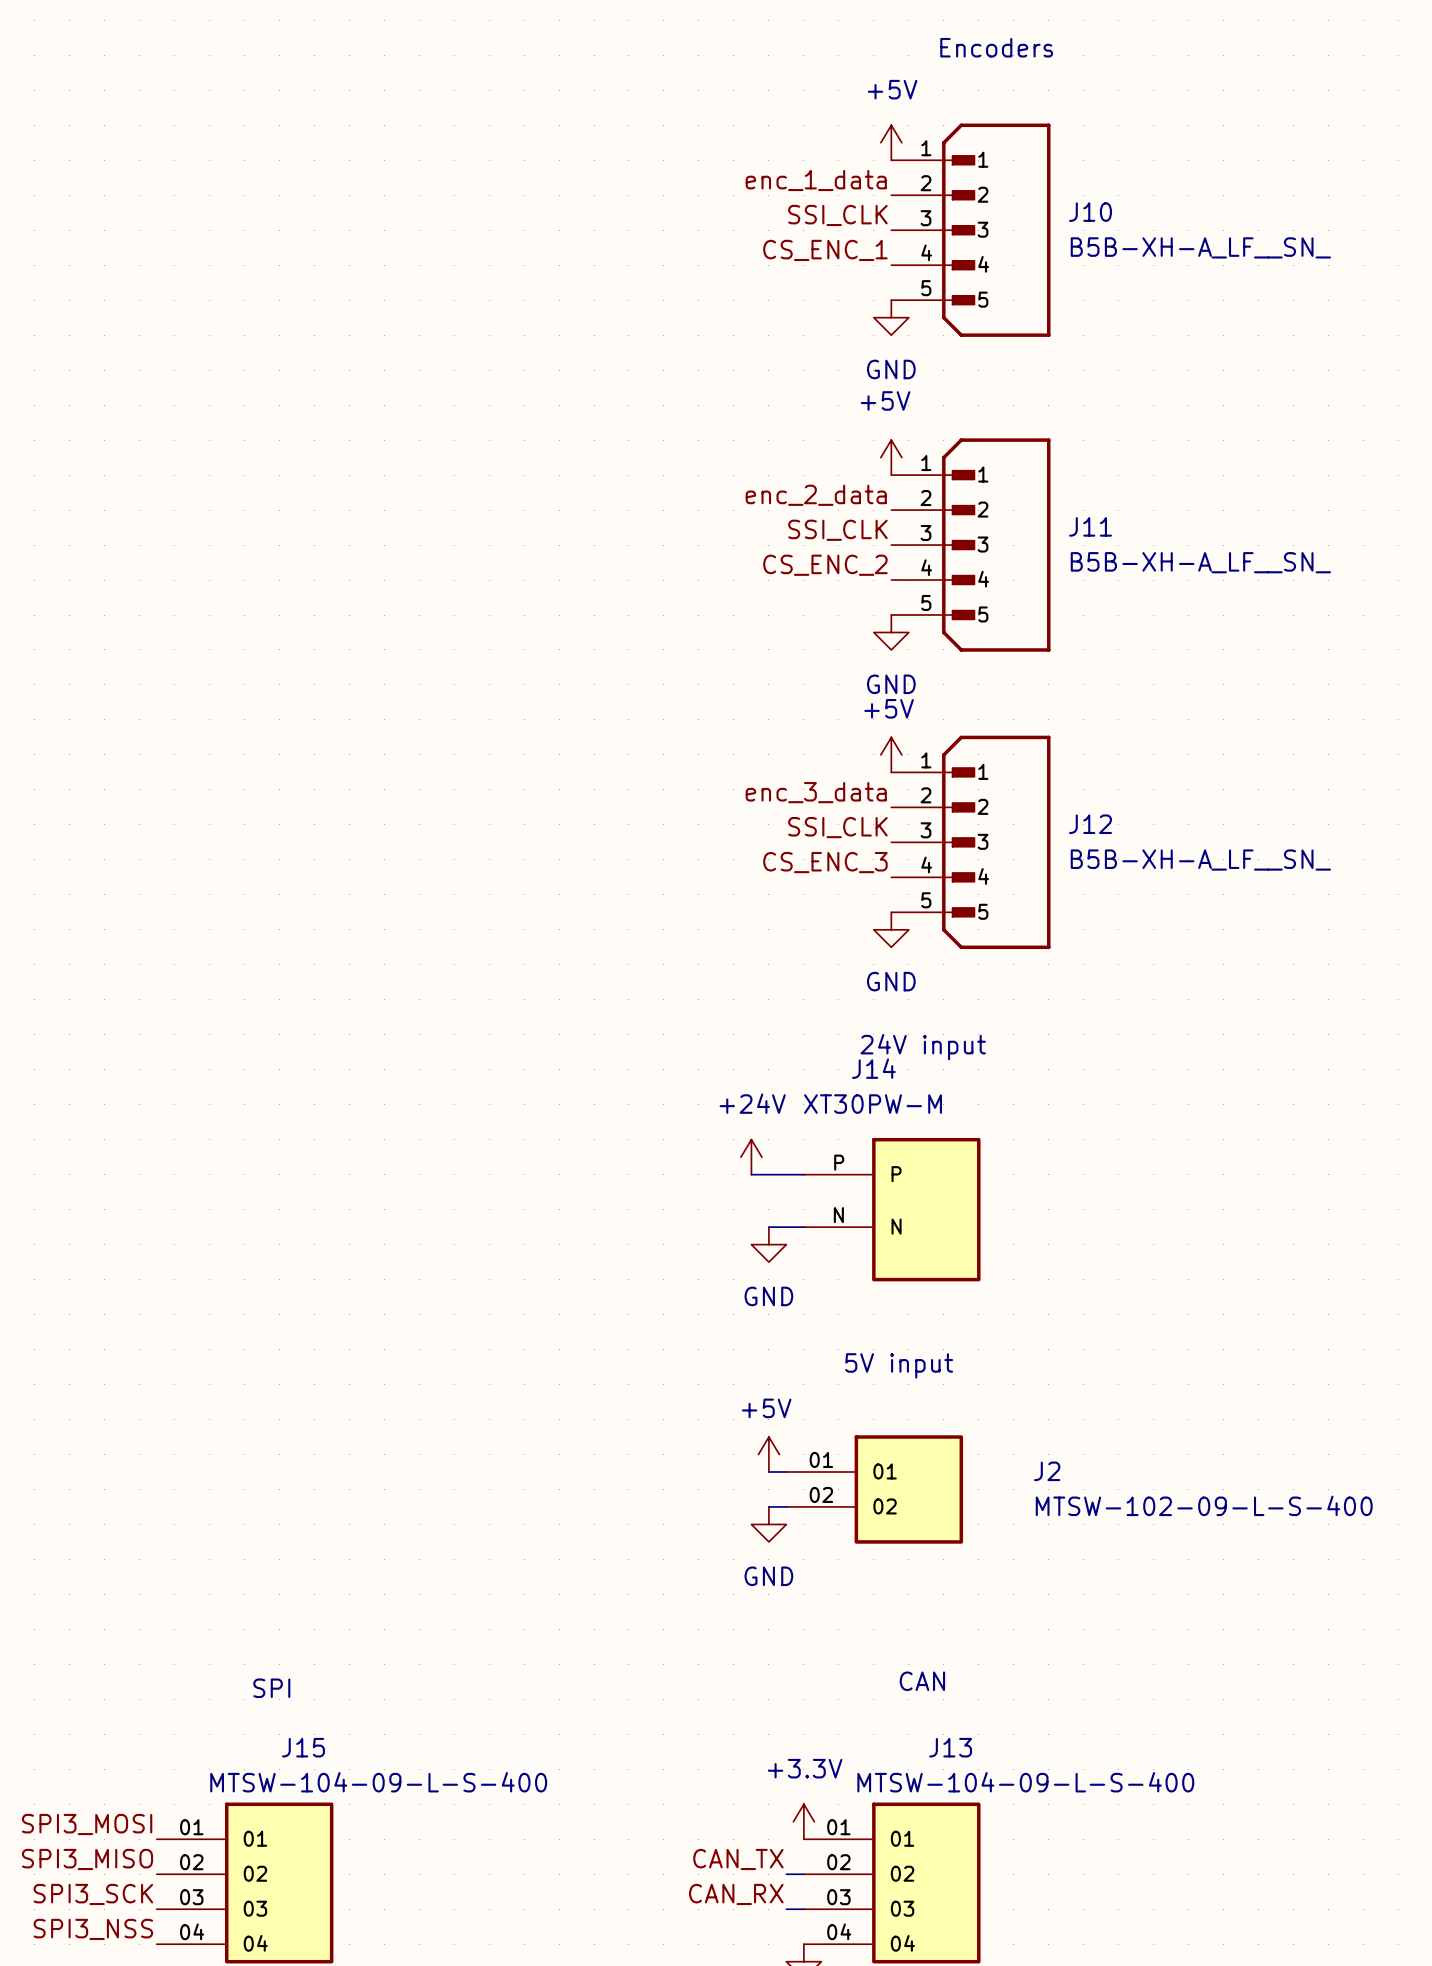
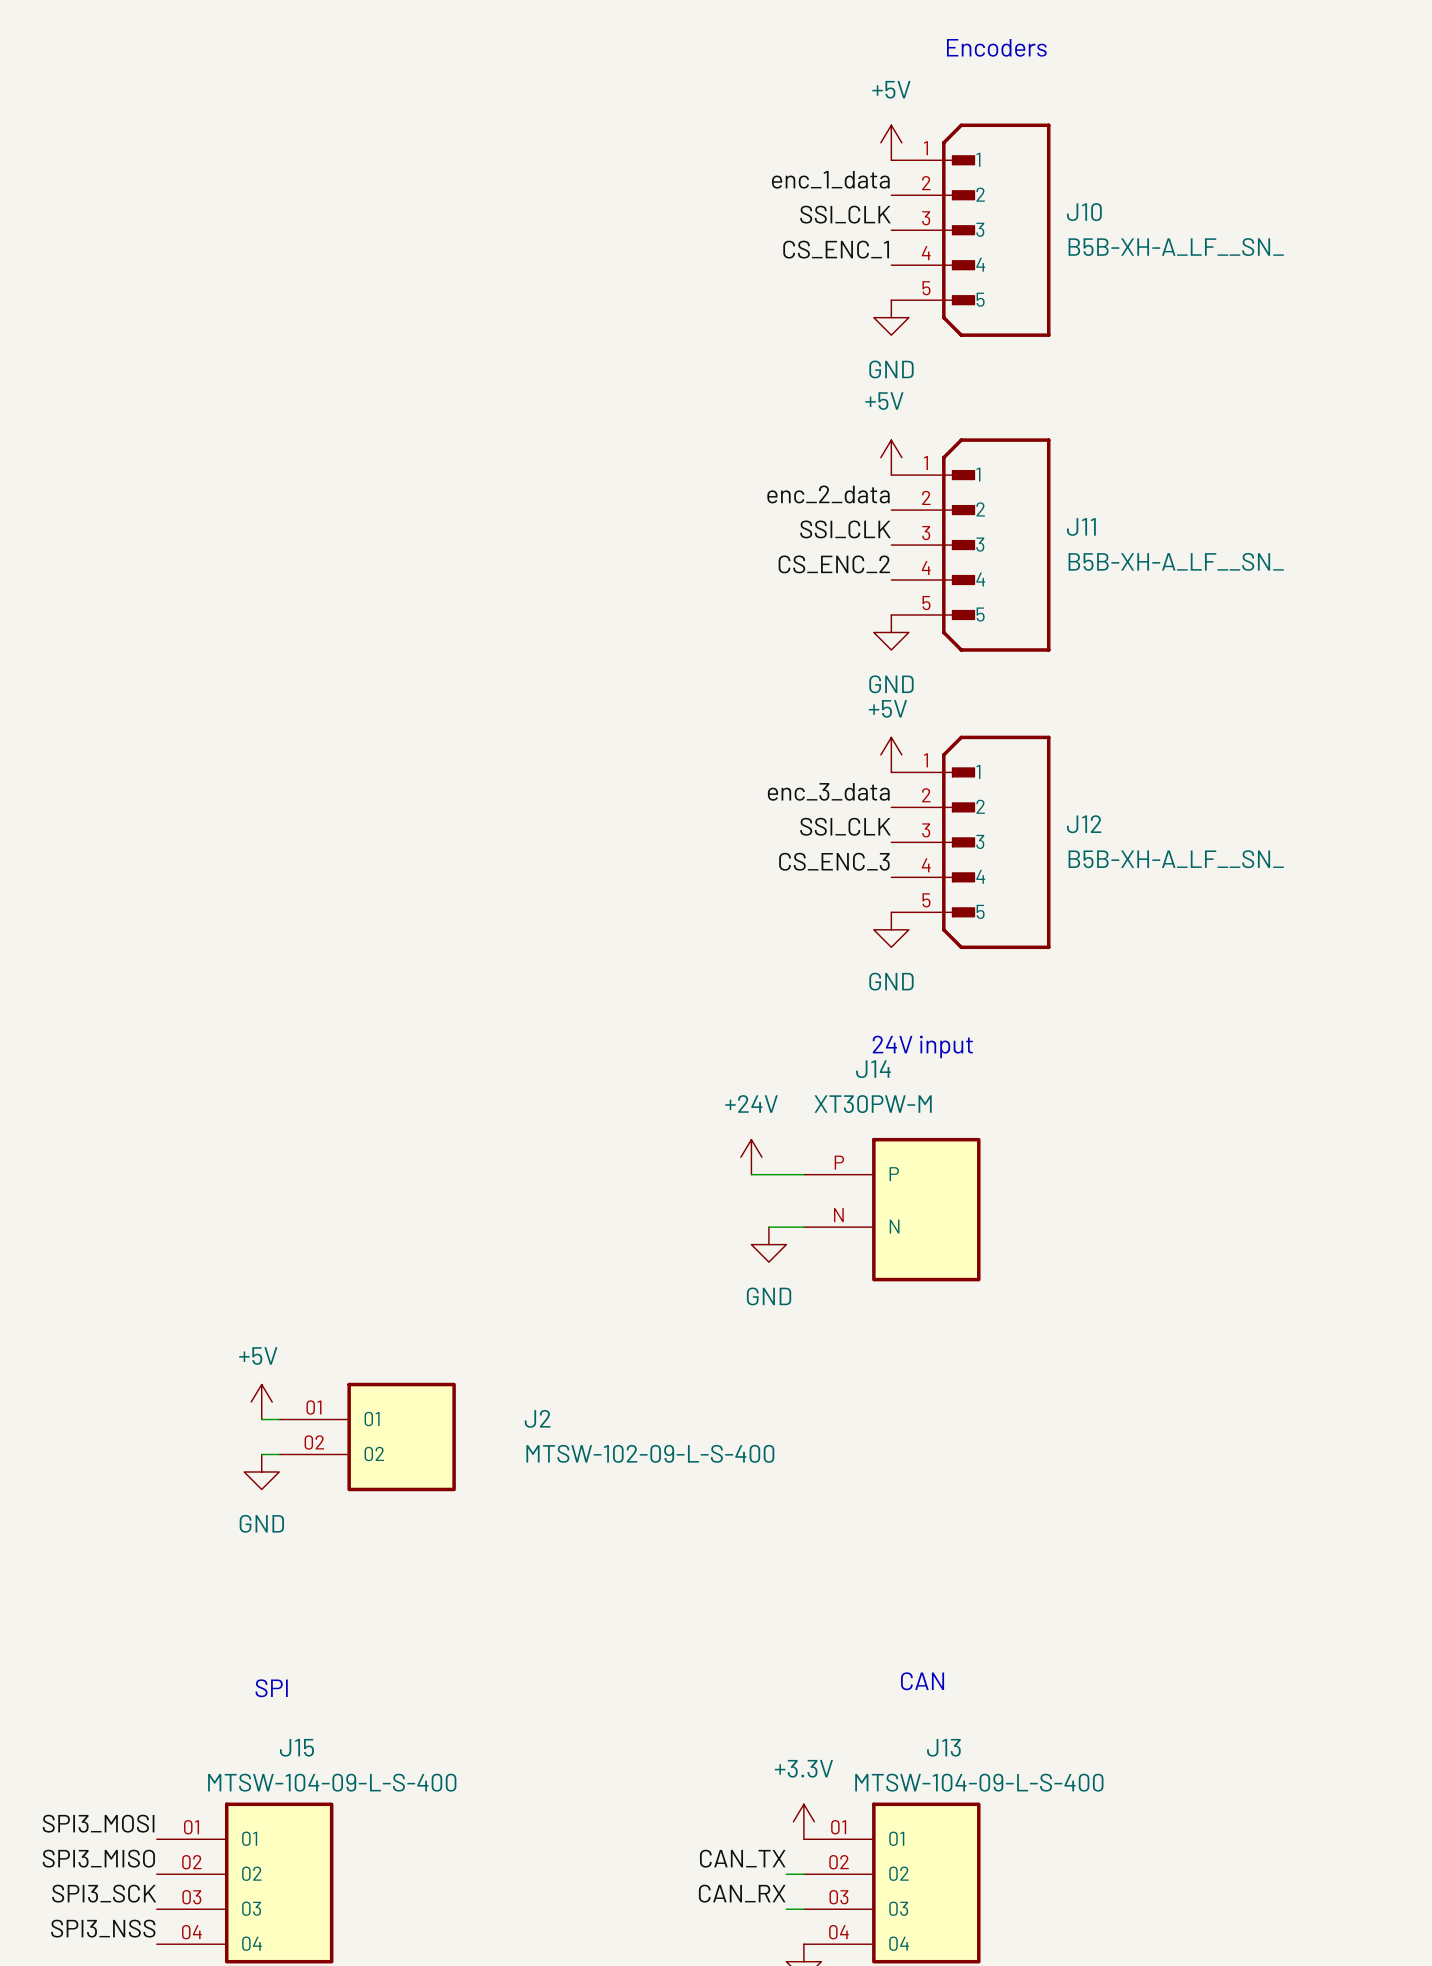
text: 5V input (899, 1365) -> none
power symbol: none -> +5V (261, 1402)
wire: none -> (261, 1419) (279, 1419)
wire: none -> (261, 1454) (279, 1454)
power symbol: +5V (768, 1454) -> none
power symbol: none -> GND (261, 1471)
wire: (768, 1471) (786, 1471) -> none
J2 position: (874, 1489) -> (367, 1437)
wire: (768, 1506) (786, 1506) -> none
power symbol: GND (768, 1524) -> none

